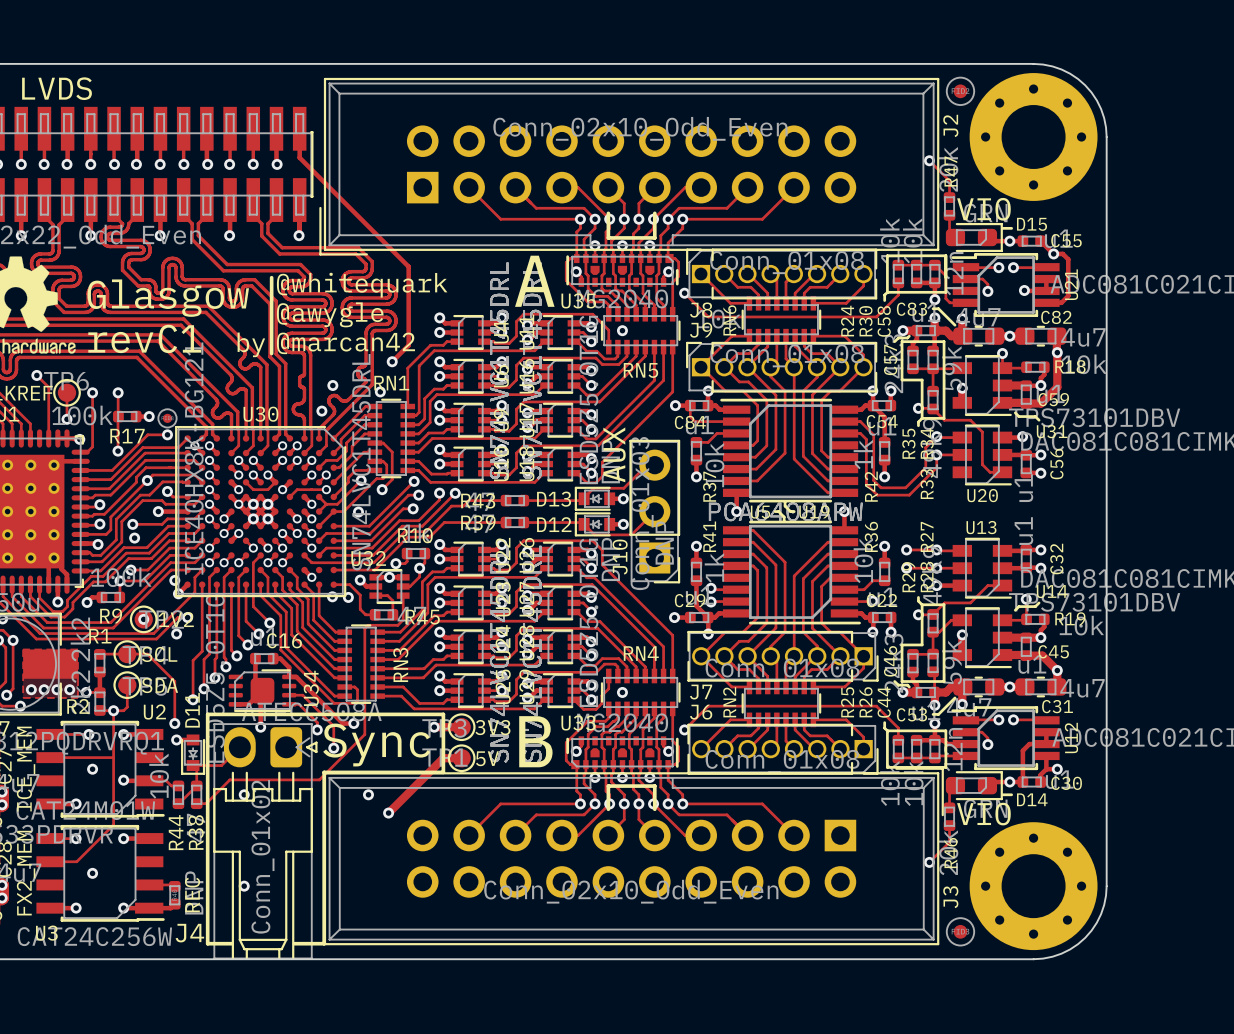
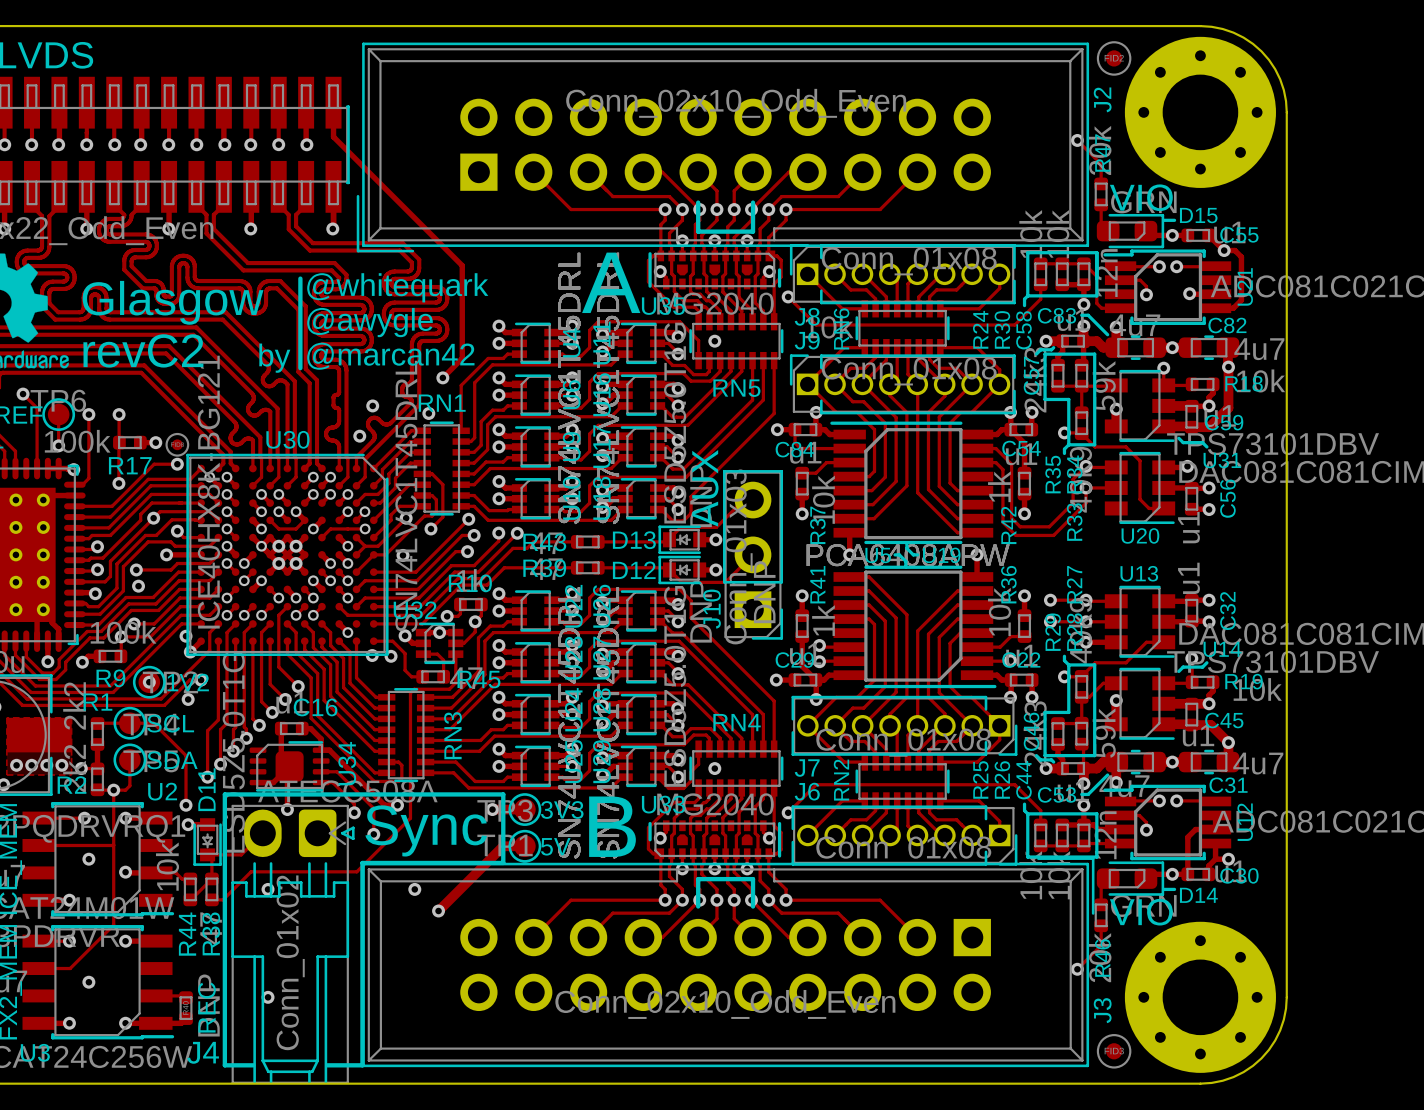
text: revC1 (144, 338) -> revC2 (143, 350)

